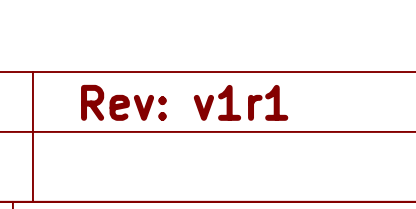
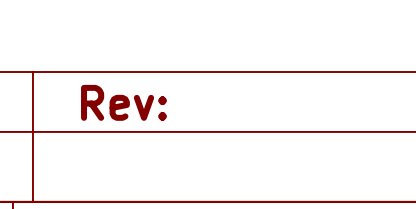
title block: Rev: v1r1 (184, 102) -> Rev: (124, 102)

